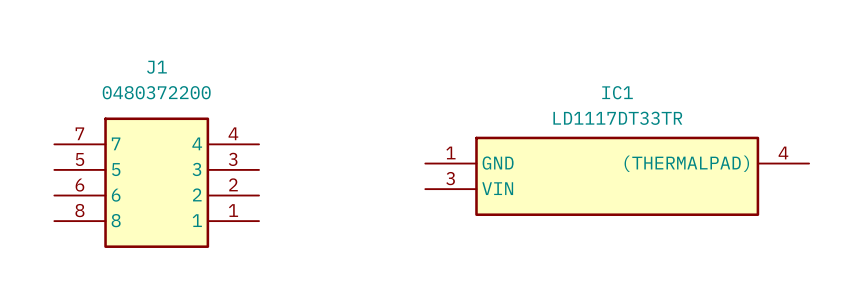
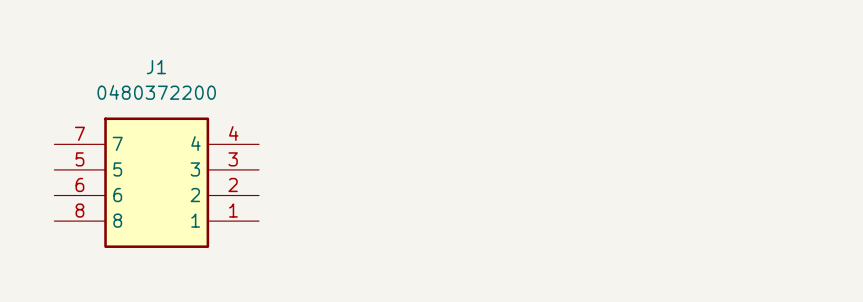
IC1: LD1117DT33TR (617, 176) -> none

